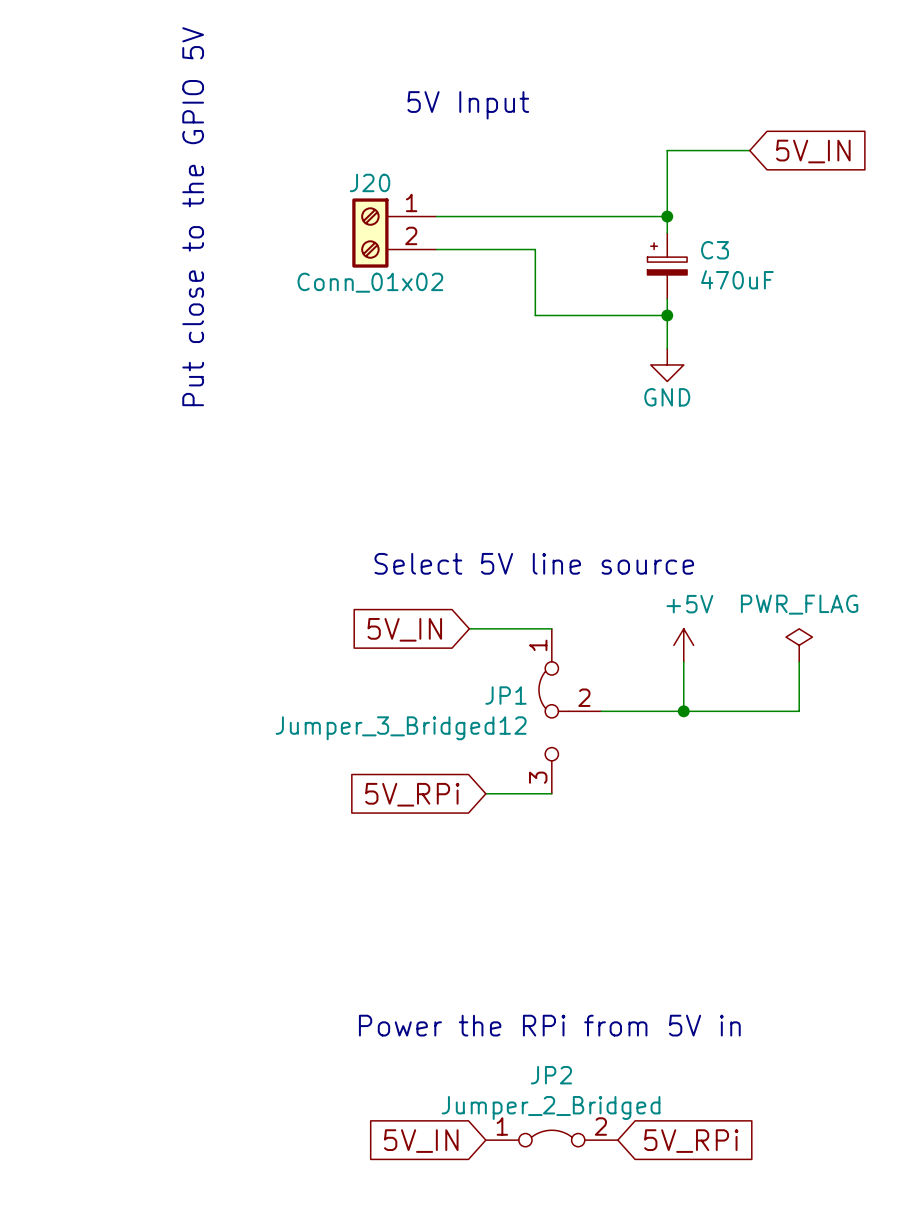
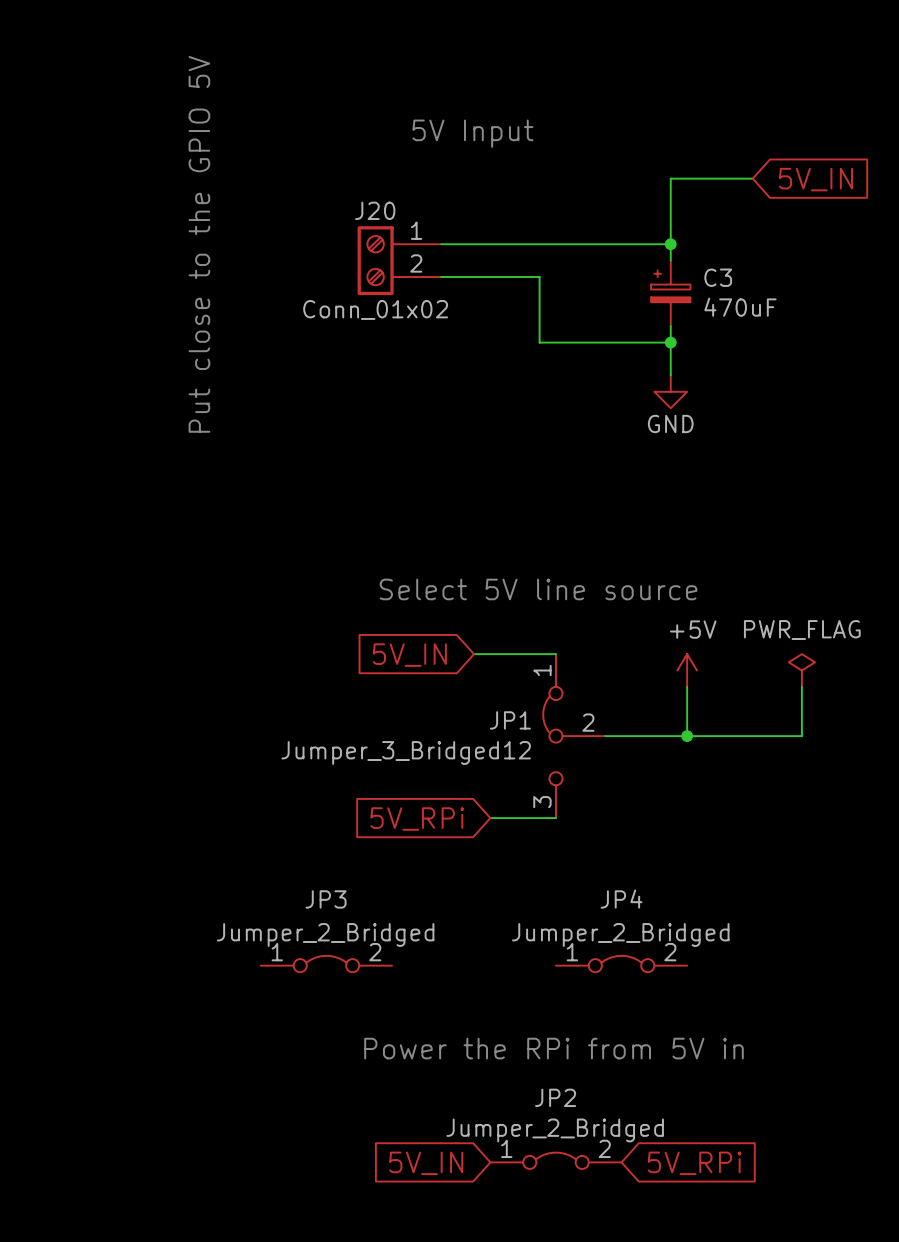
JP3: none -> Jumper_2_Bridged (326, 964)
JP4: none -> Jumper_2_Bridged (621, 964)

